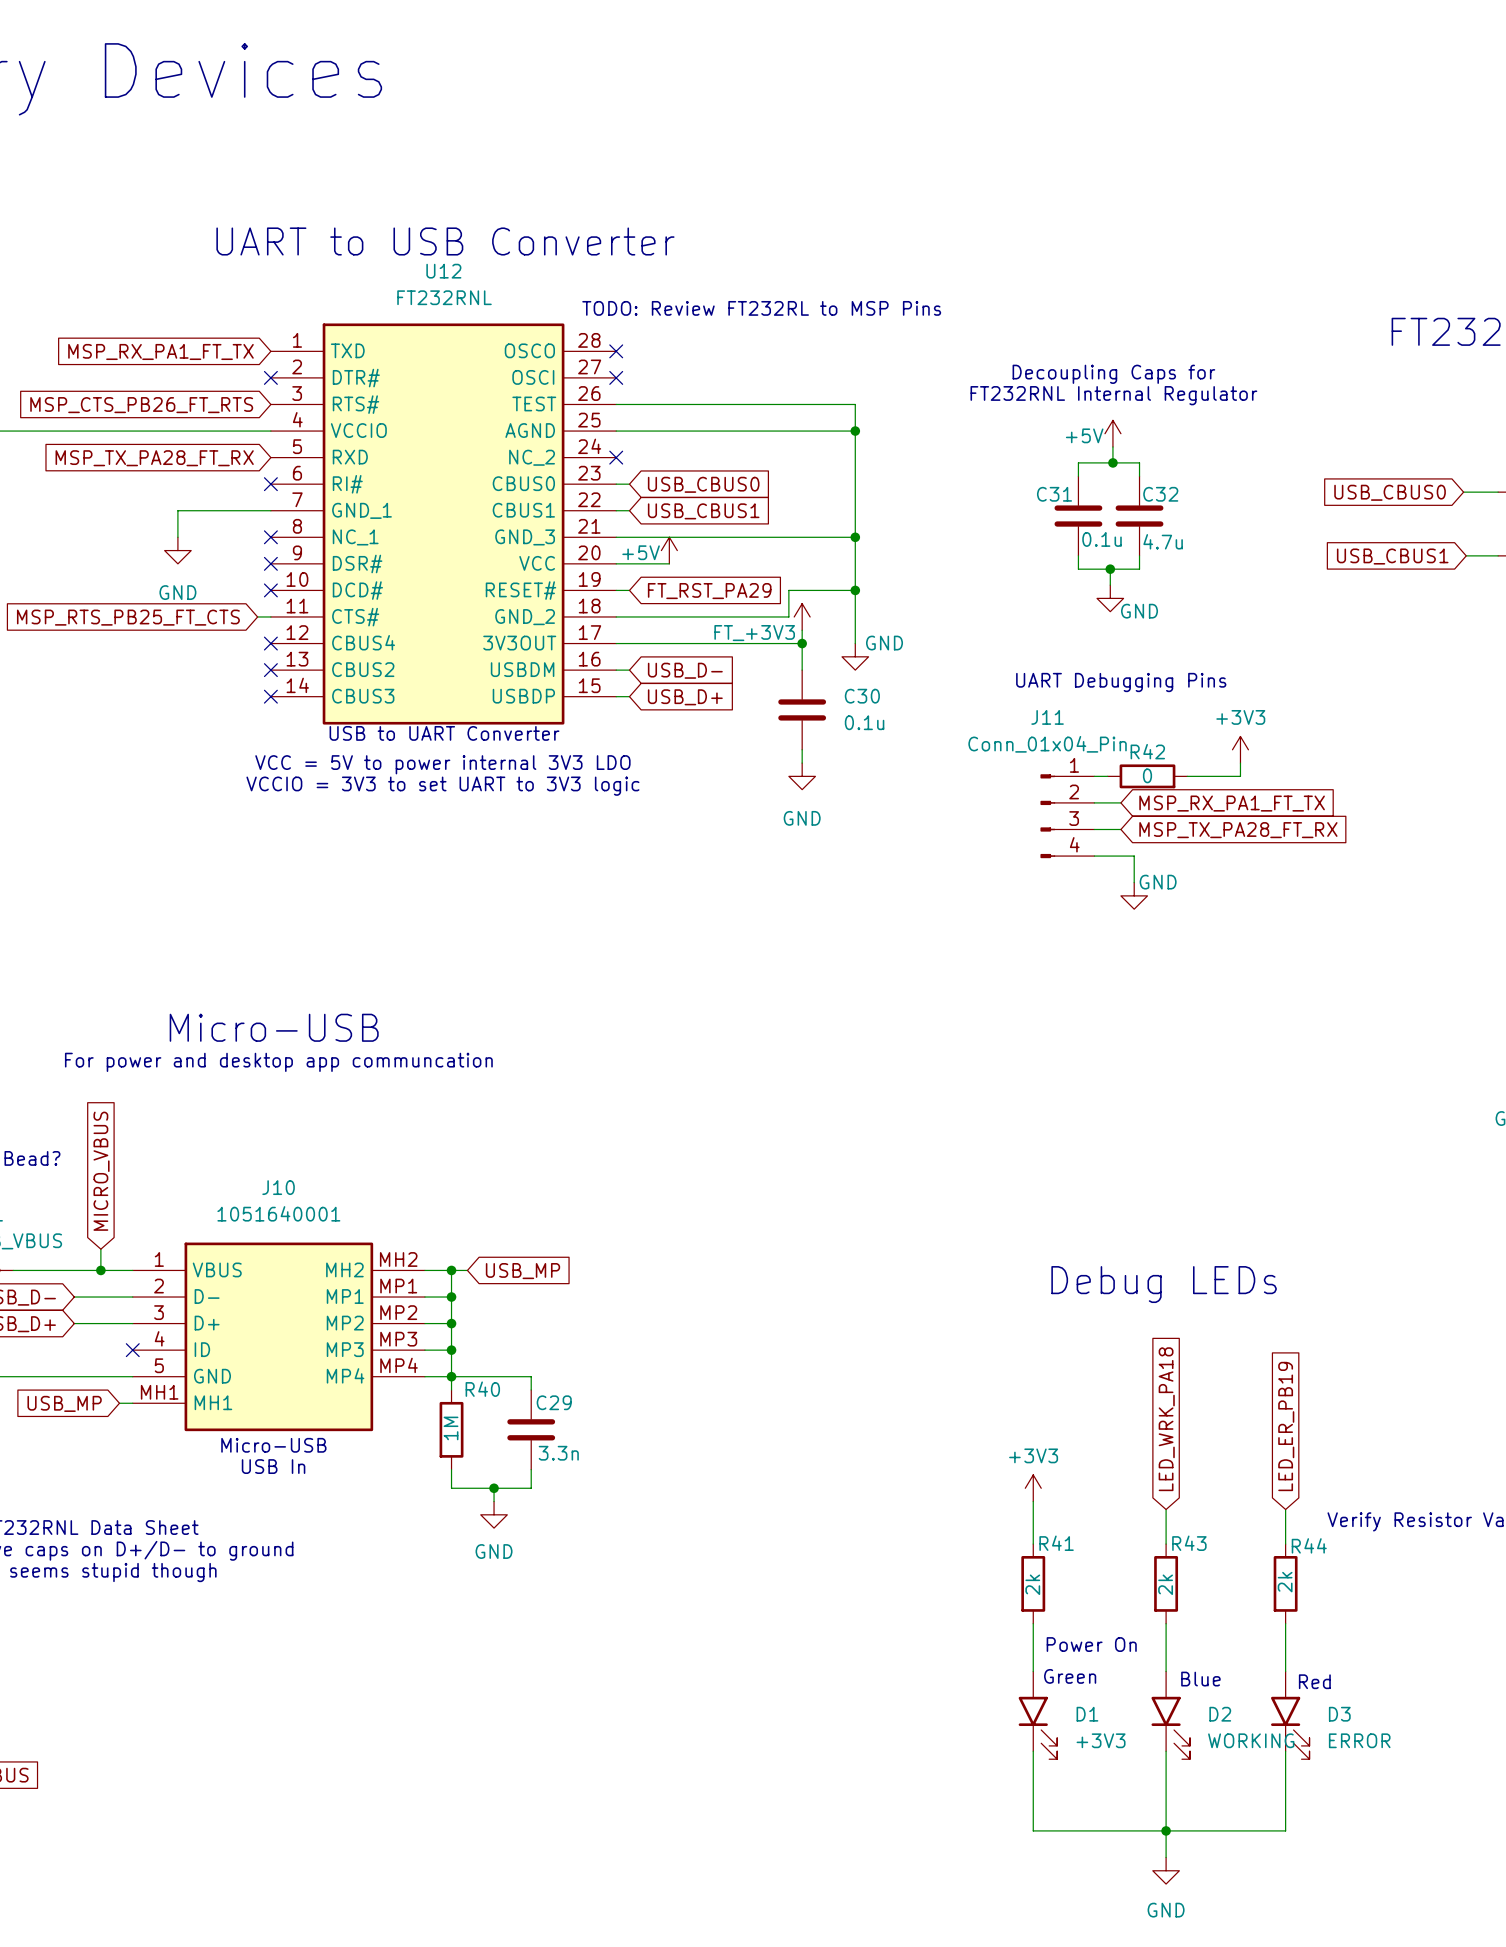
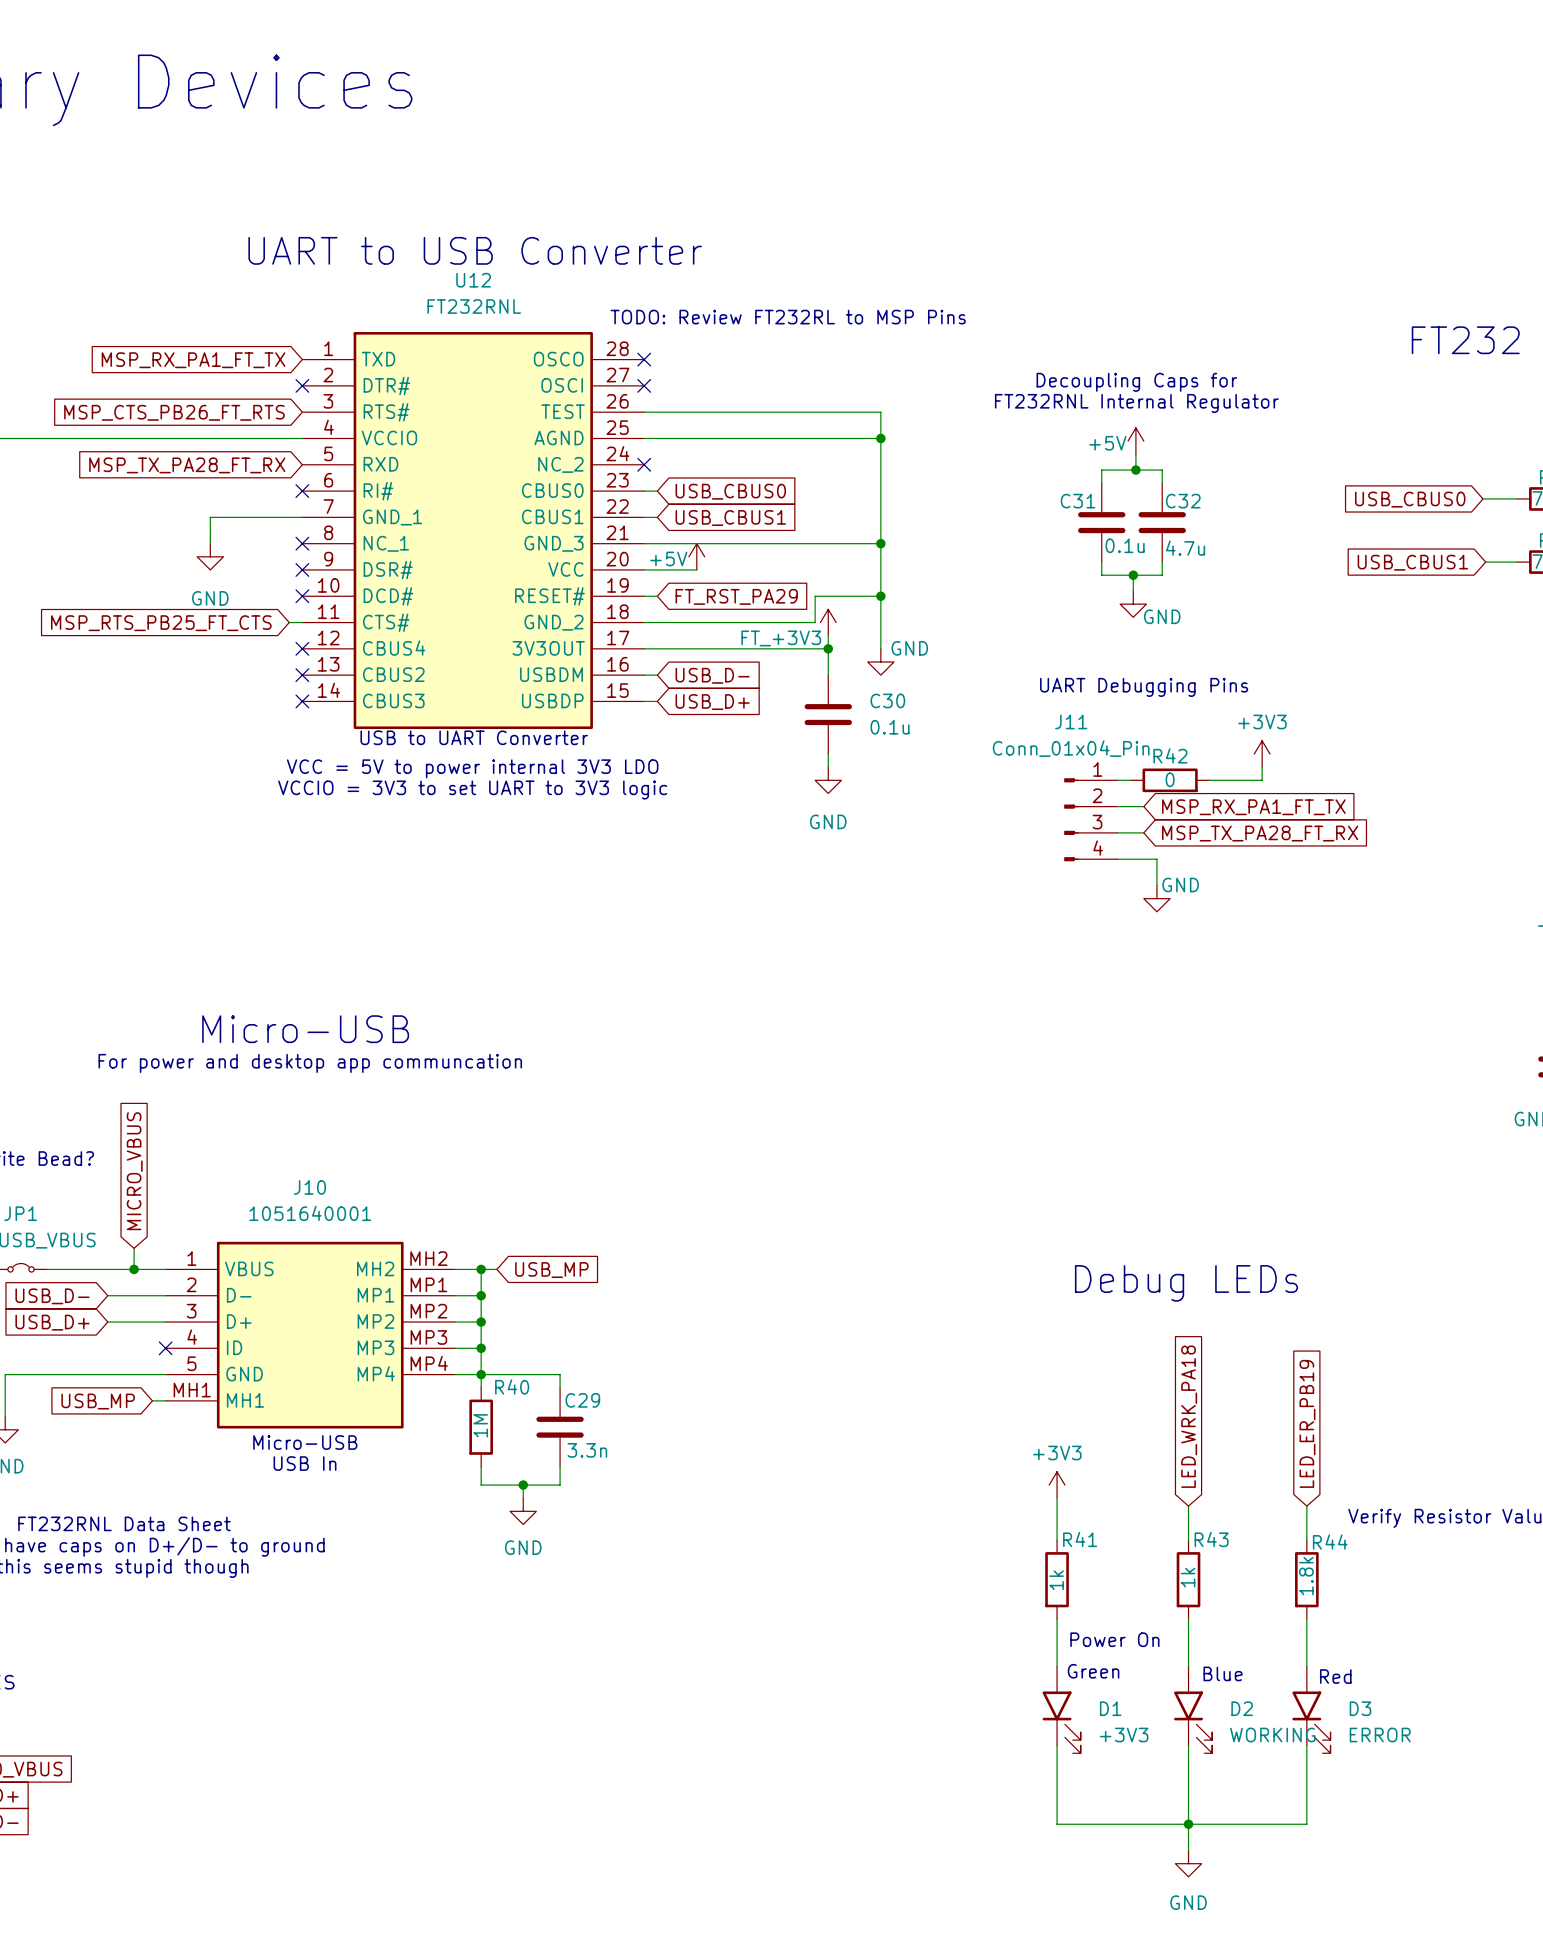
R44 value: 2k (1285, 1582) -> 1.8k (1306, 1576)
R41 value: 2k (1032, 1584) -> 1k (1056, 1580)
R43 value: 2k (1165, 1584) -> 1k (1188, 1577)

